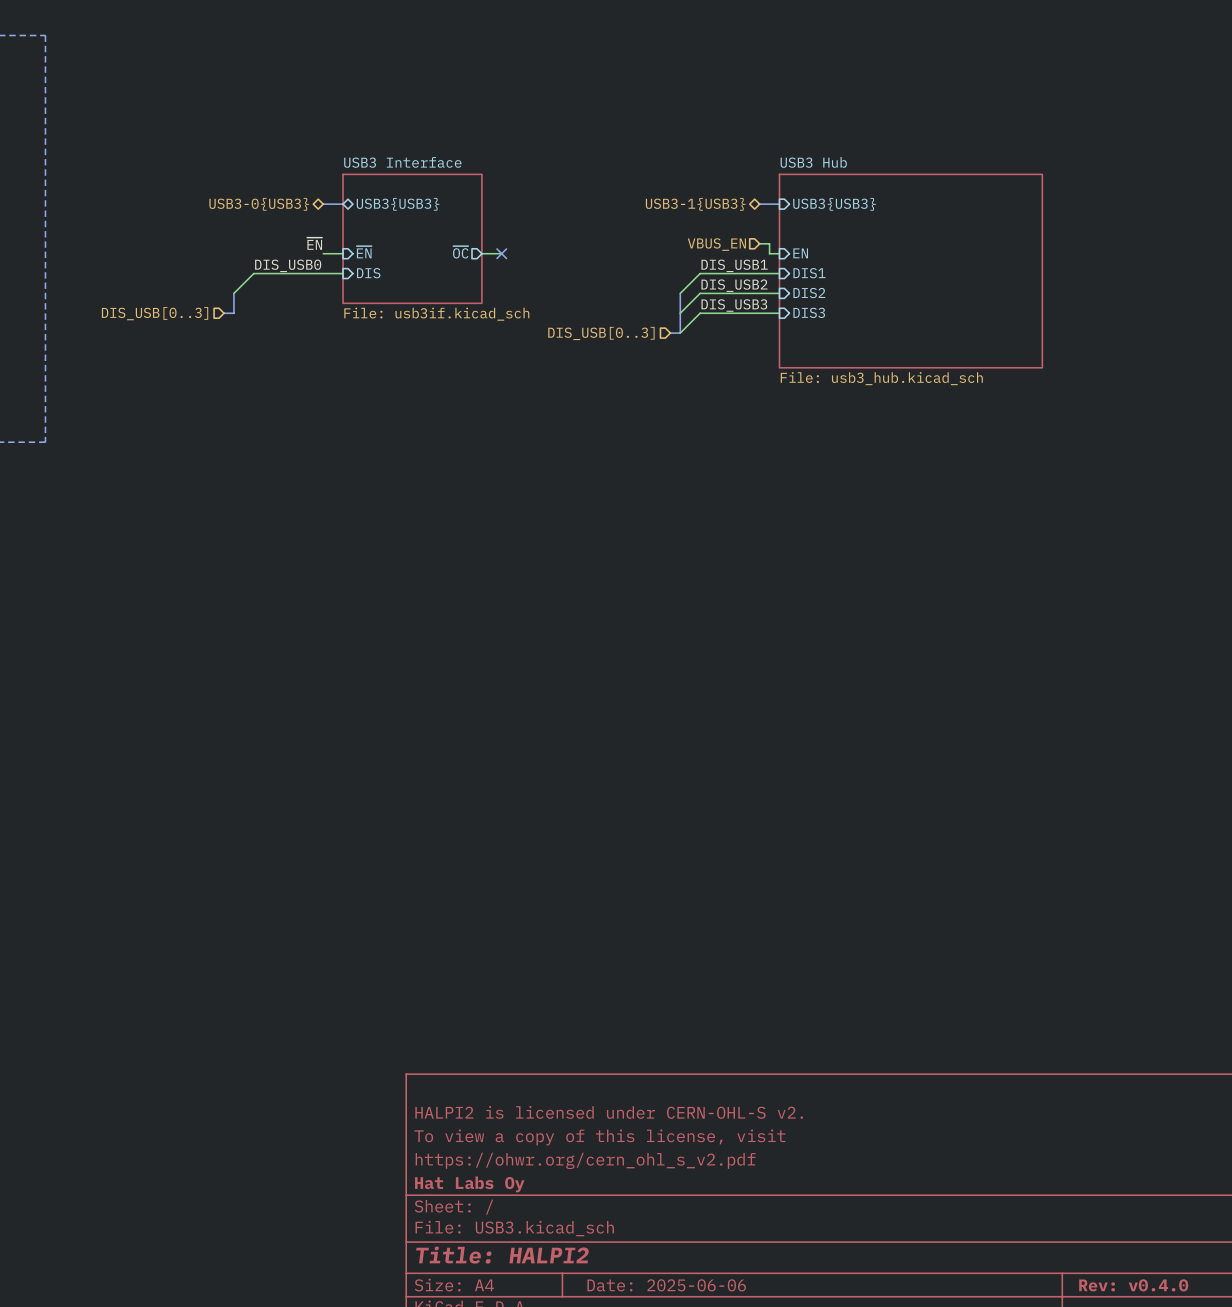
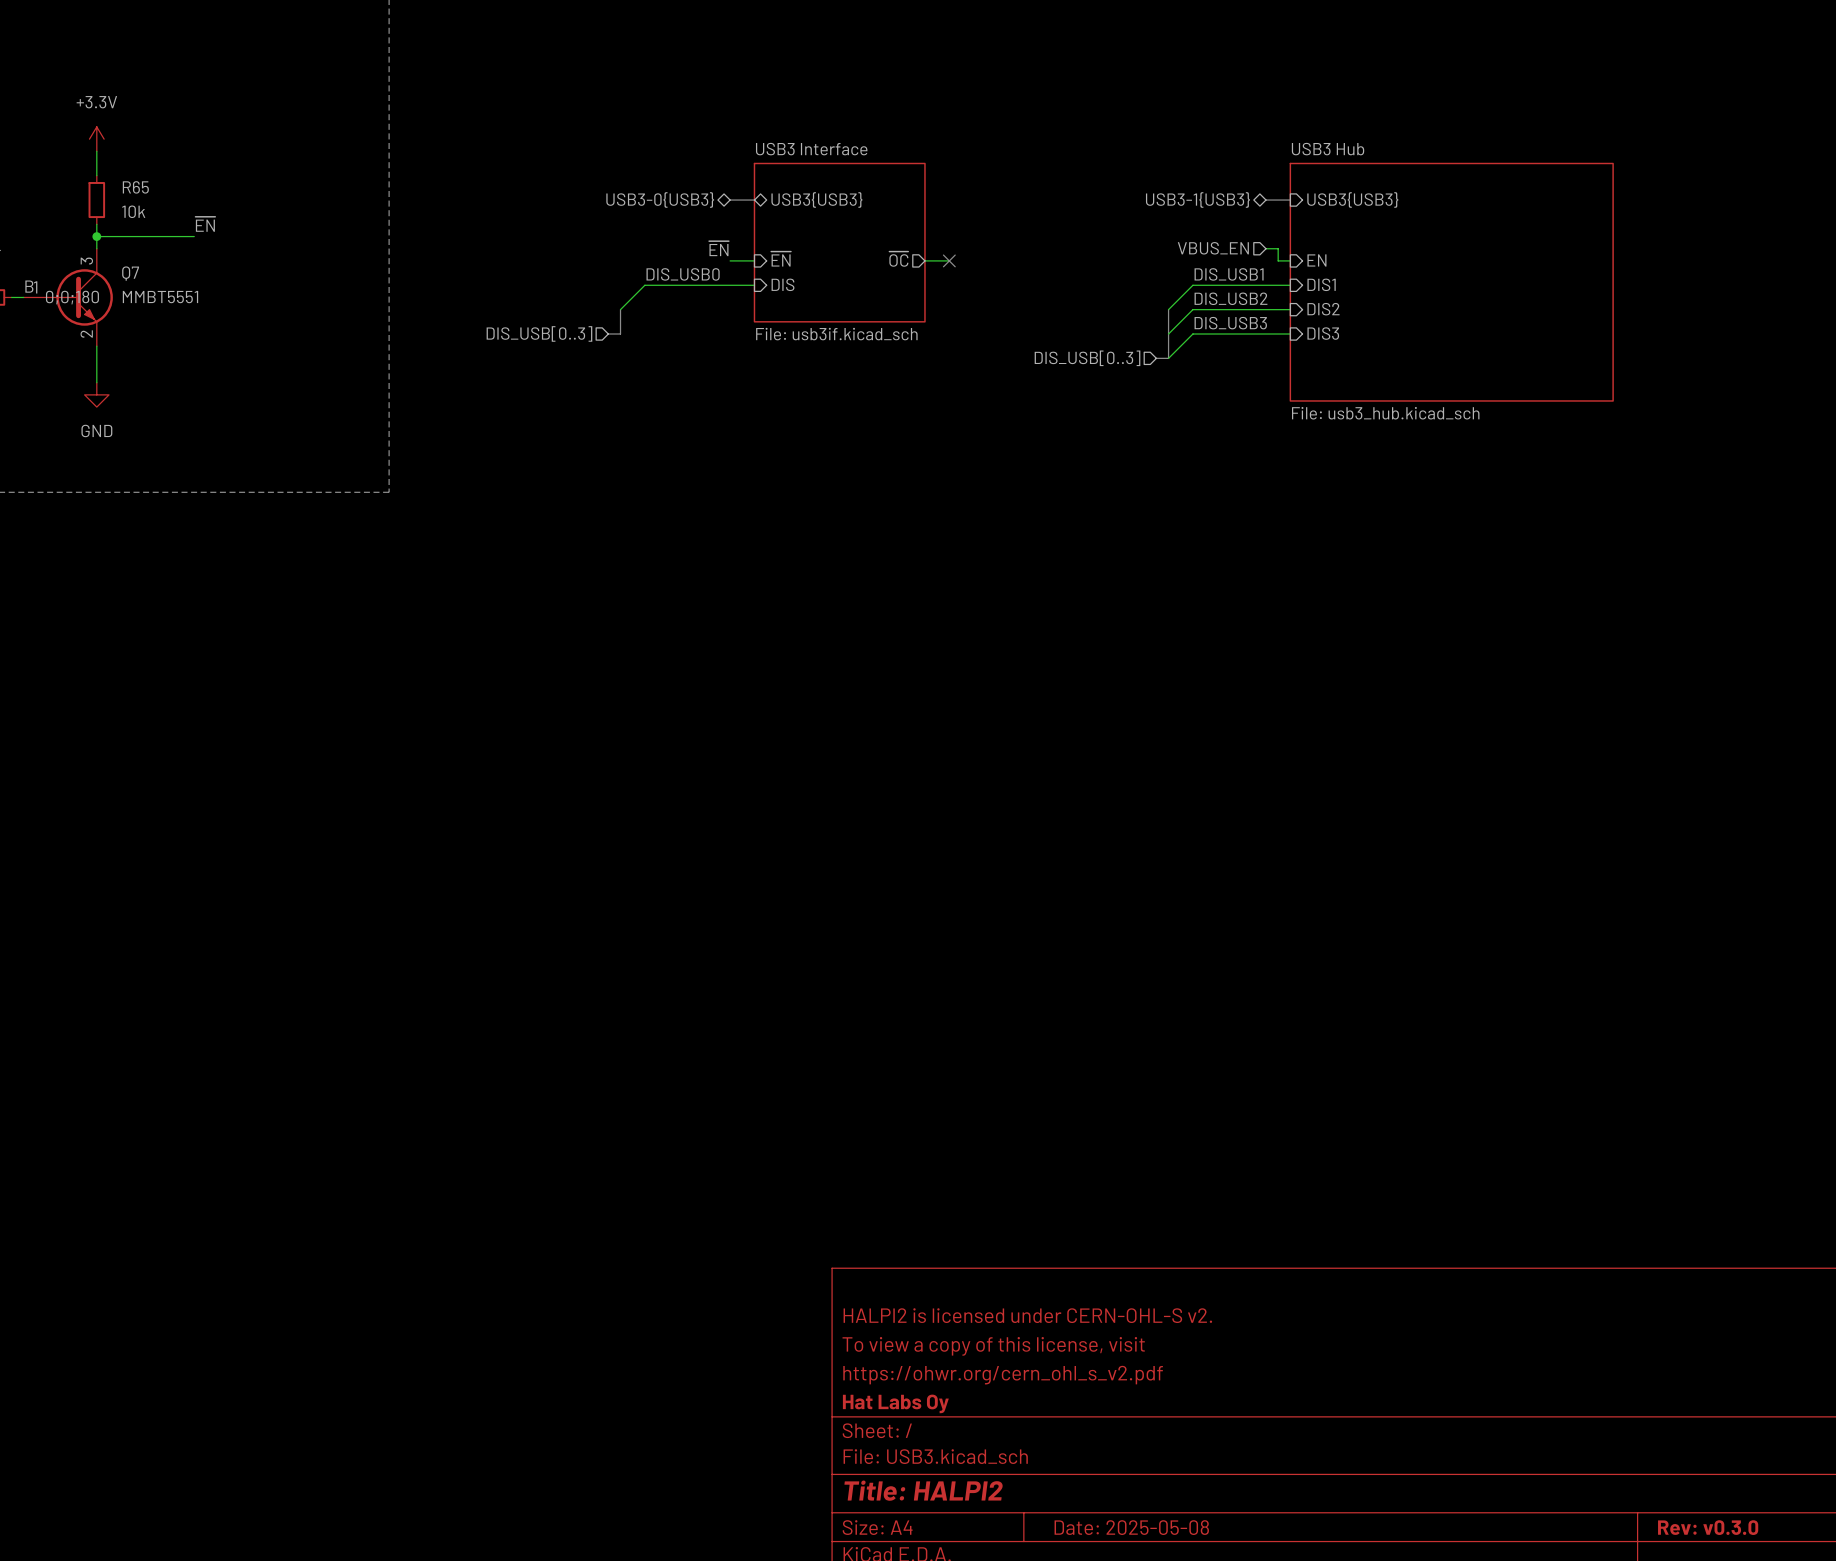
title block: Date: 2025-06-06 (666, 1285) -> Date: 2025-05-08 (1131, 1527)
title block: Rev: v0.4.0 (1133, 1285) -> Rev: v0.3.0 (1708, 1527)

